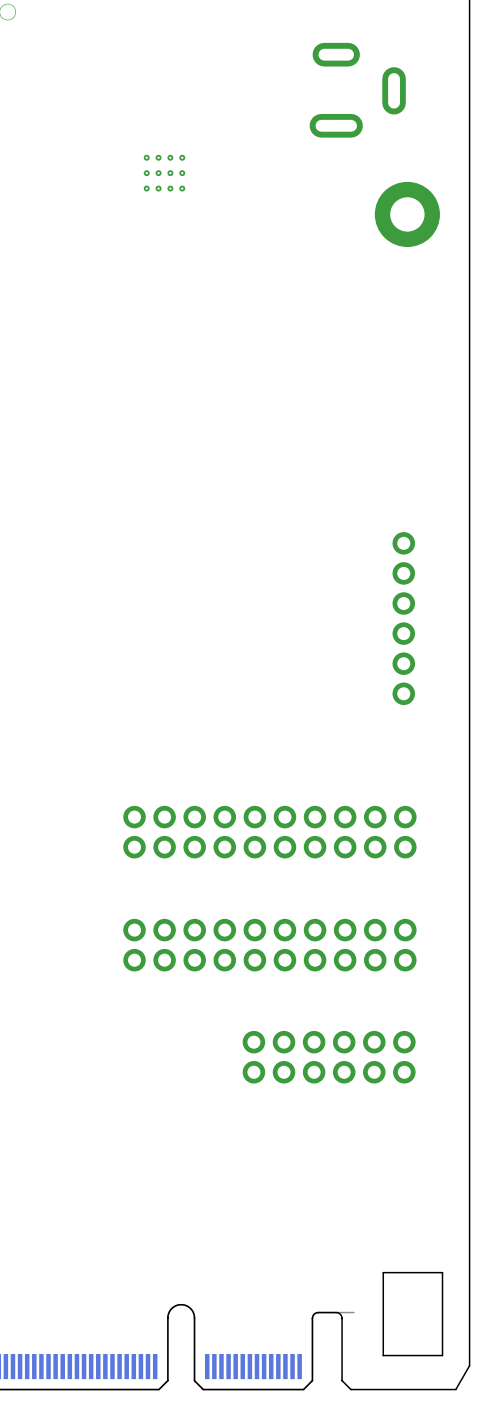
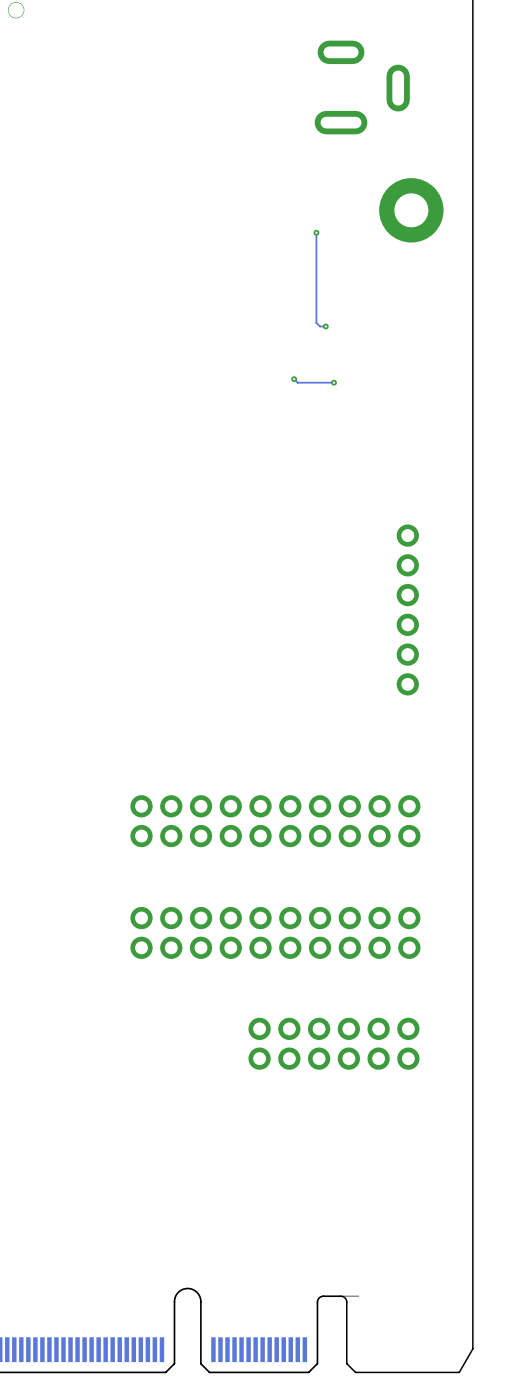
part: (164, 173) -> none
track: none -> (316, 232) (316, 322) (319, 326) (325, 326)
via: none -> (316, 232)
via: none -> (325, 326)
track: none -> (294, 379) (297, 382) (333, 382)
via: none -> (294, 379)
via: none -> (333, 382)
board edge: (442, 1272) (383, 1272) (383, 1355) (442, 1355) (442, 1272) -> none

